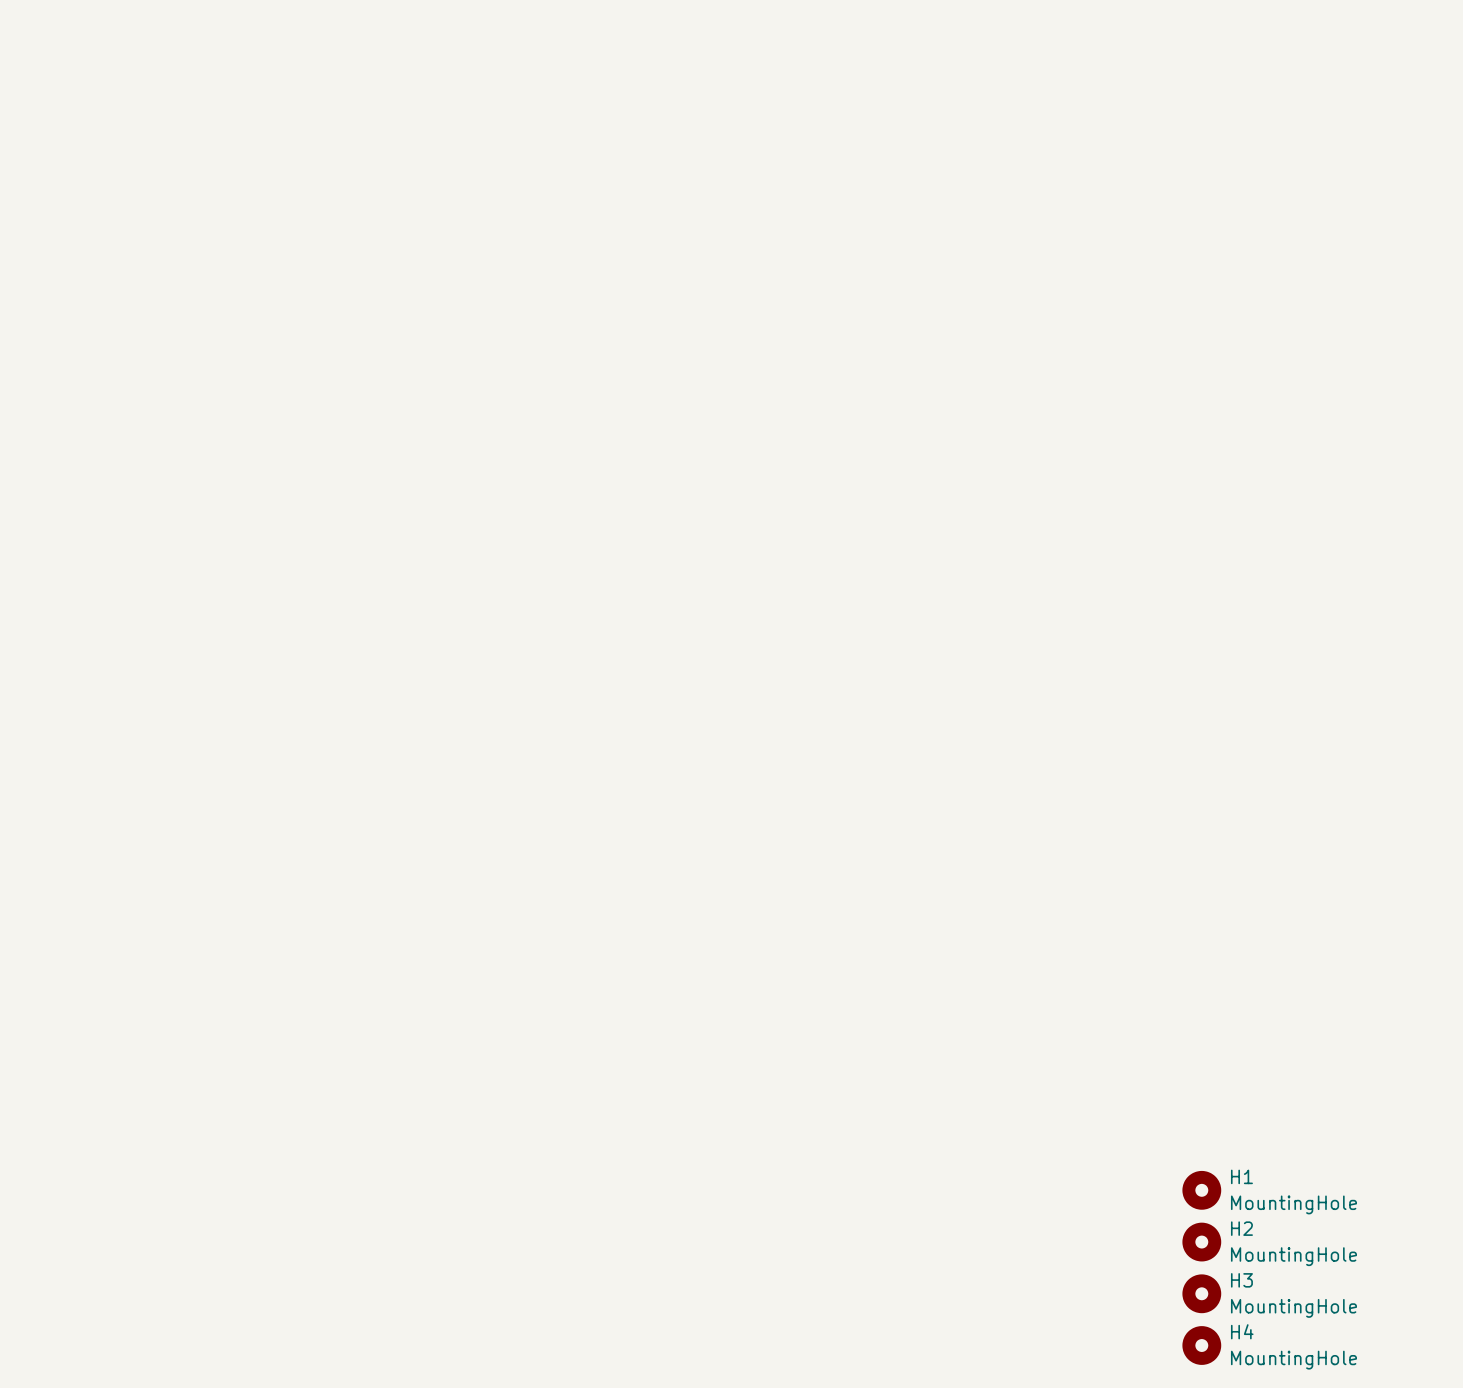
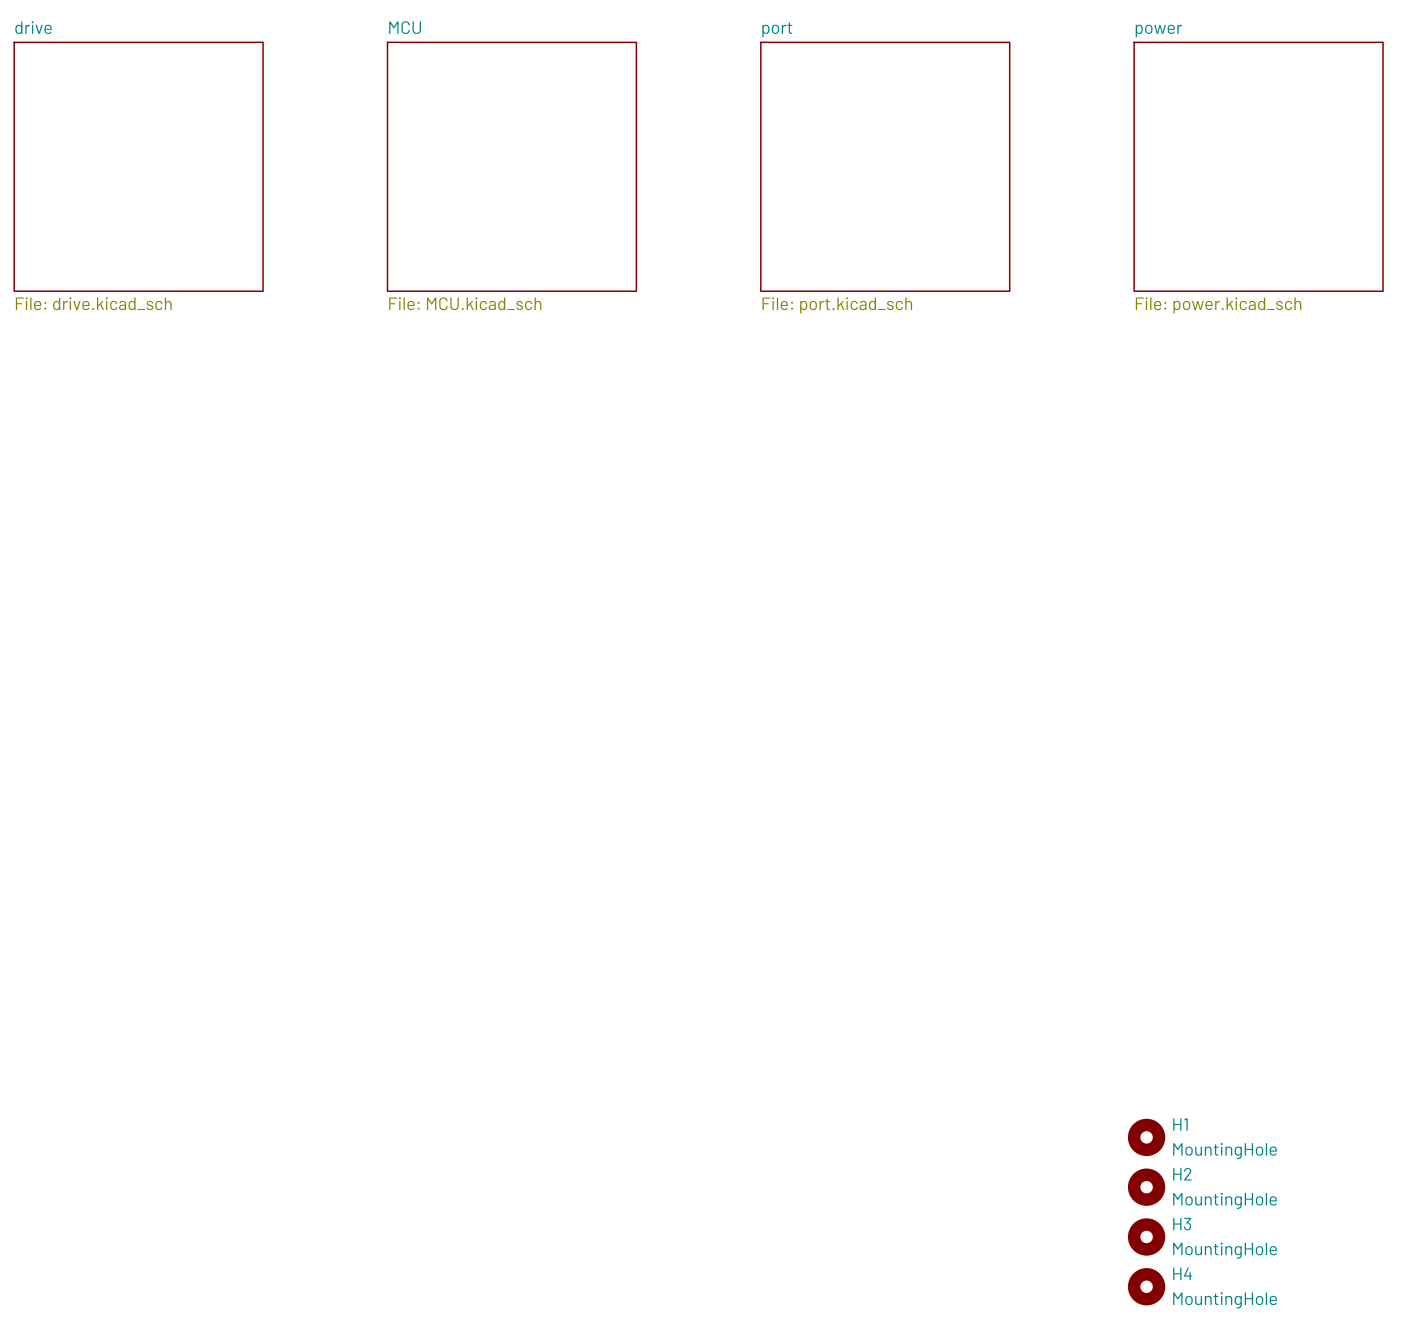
sheet drive: none -> File: drive.kicad_sch (138, 166)
sheet MCU: none -> File: MCU.kicad_sch (511, 166)
sheet port: none -> File: port.kicad_sch (885, 166)
sheet power: none -> File: power.kicad_sch (1258, 166)

